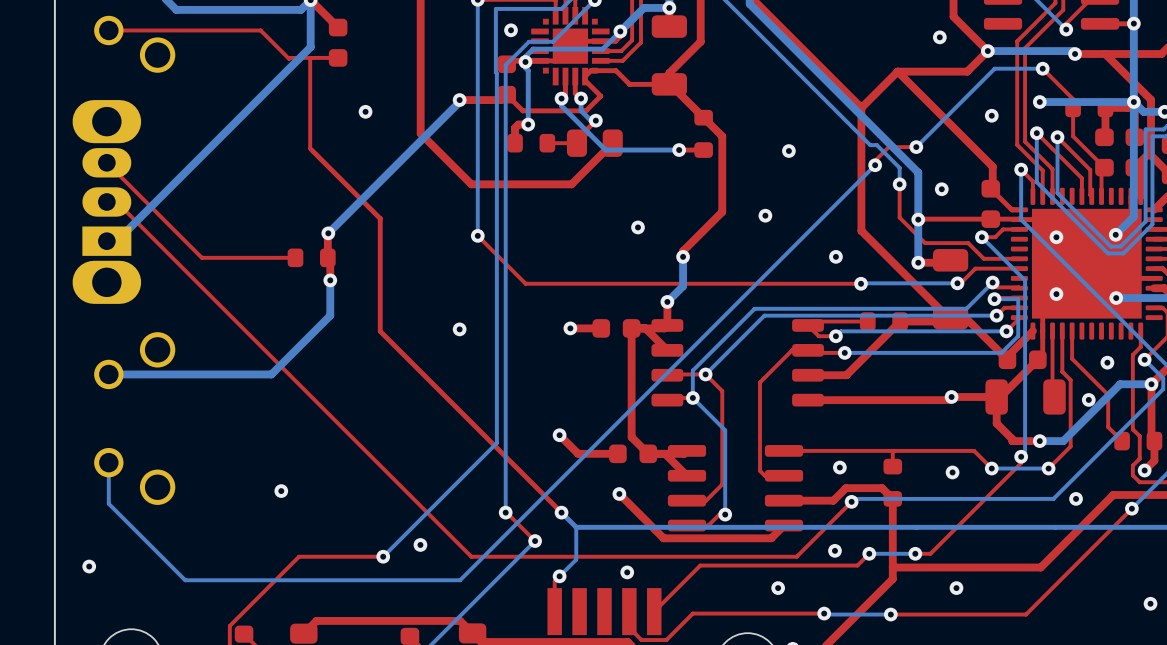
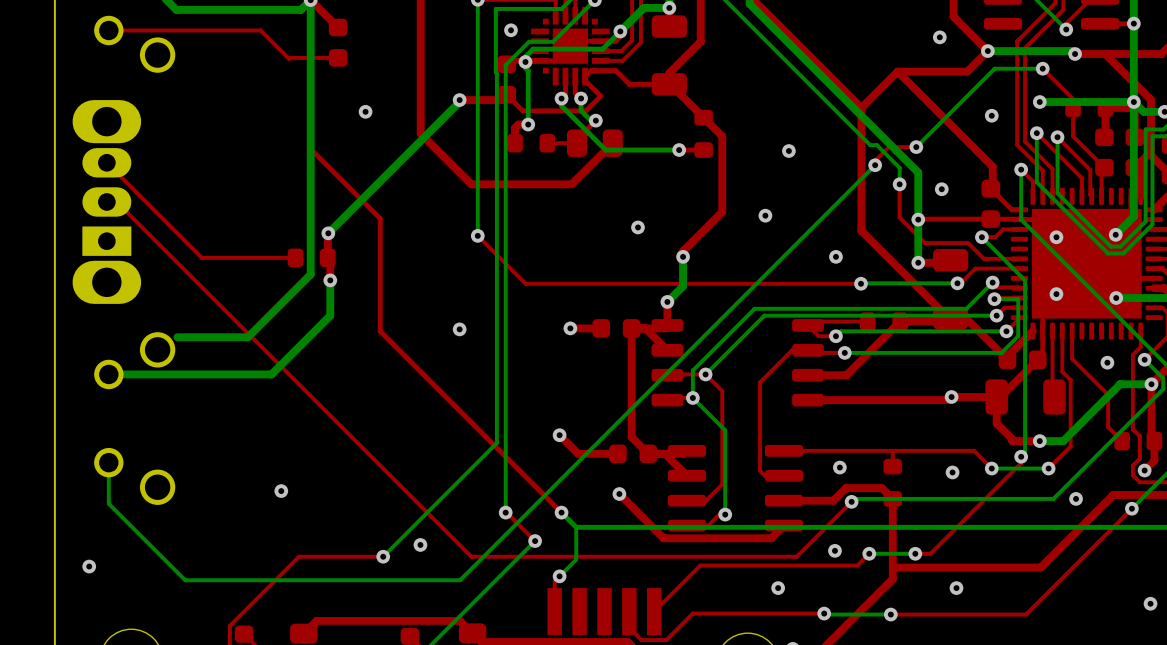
bottom track: (310, 47) (116, 241) (106, 241) -> (310, 47) (310, 274) (247, 337) (177, 337)
via: (1088, 399) -> none
via: (627, 572) -> none

